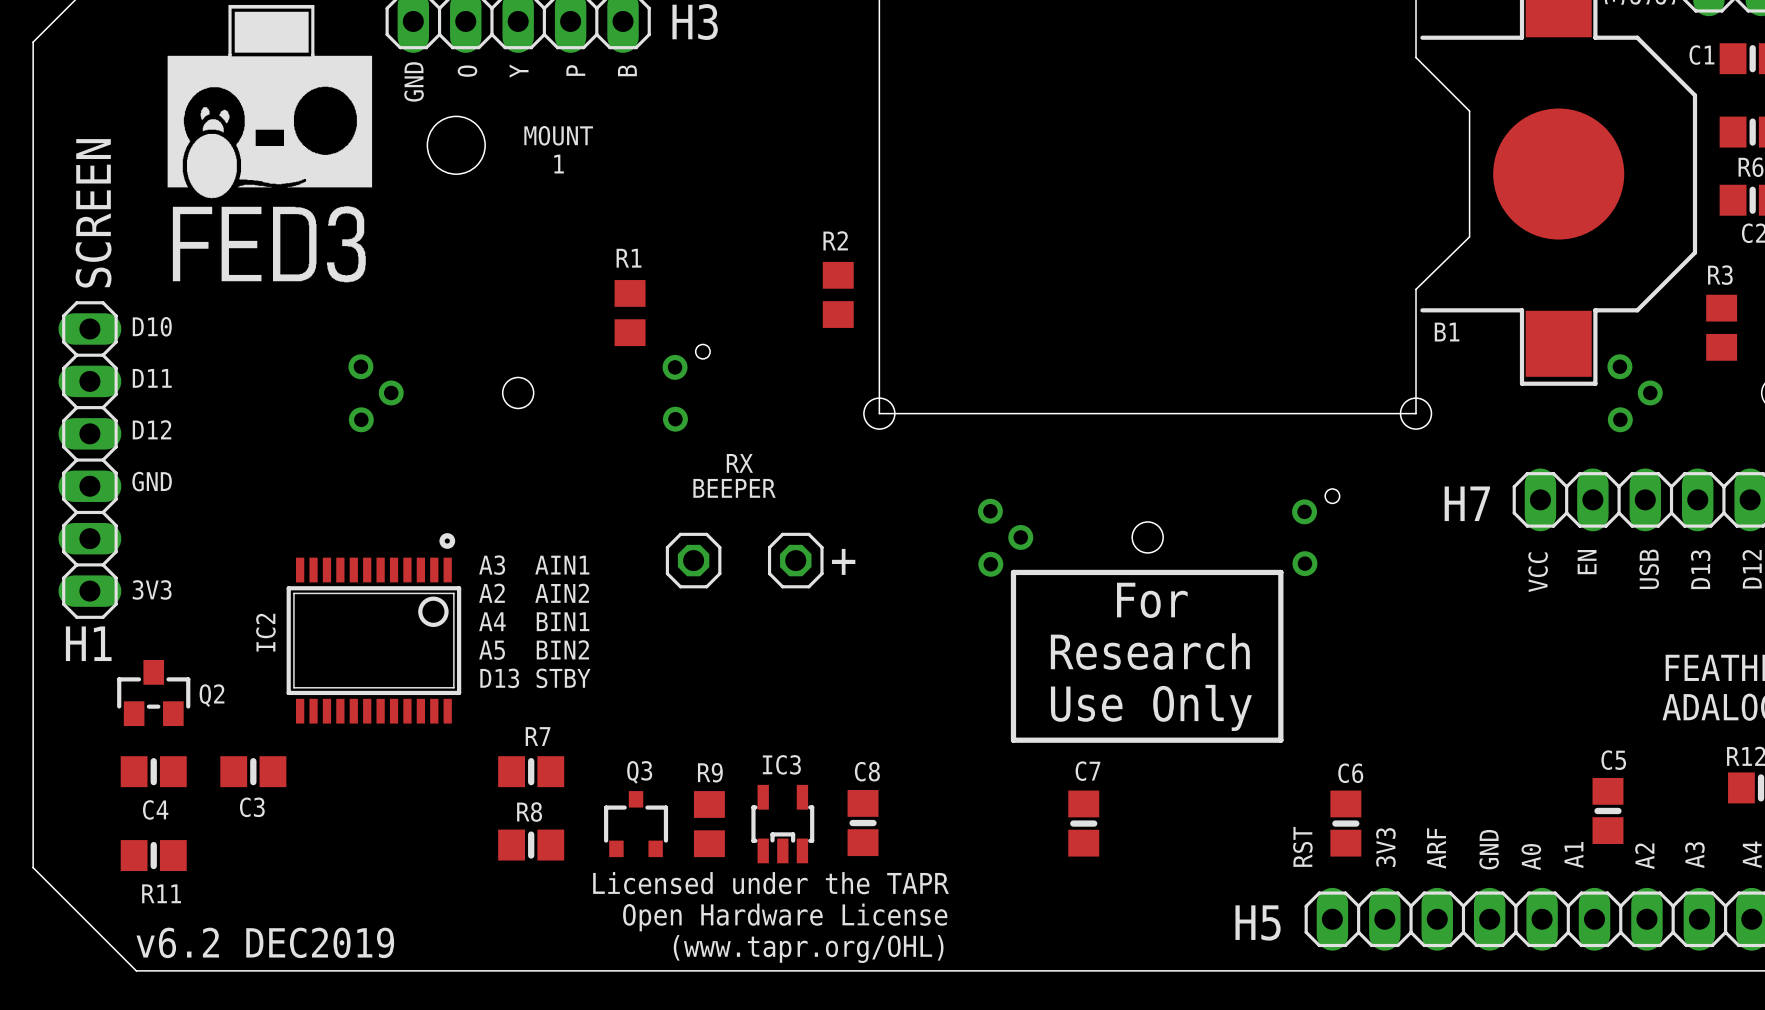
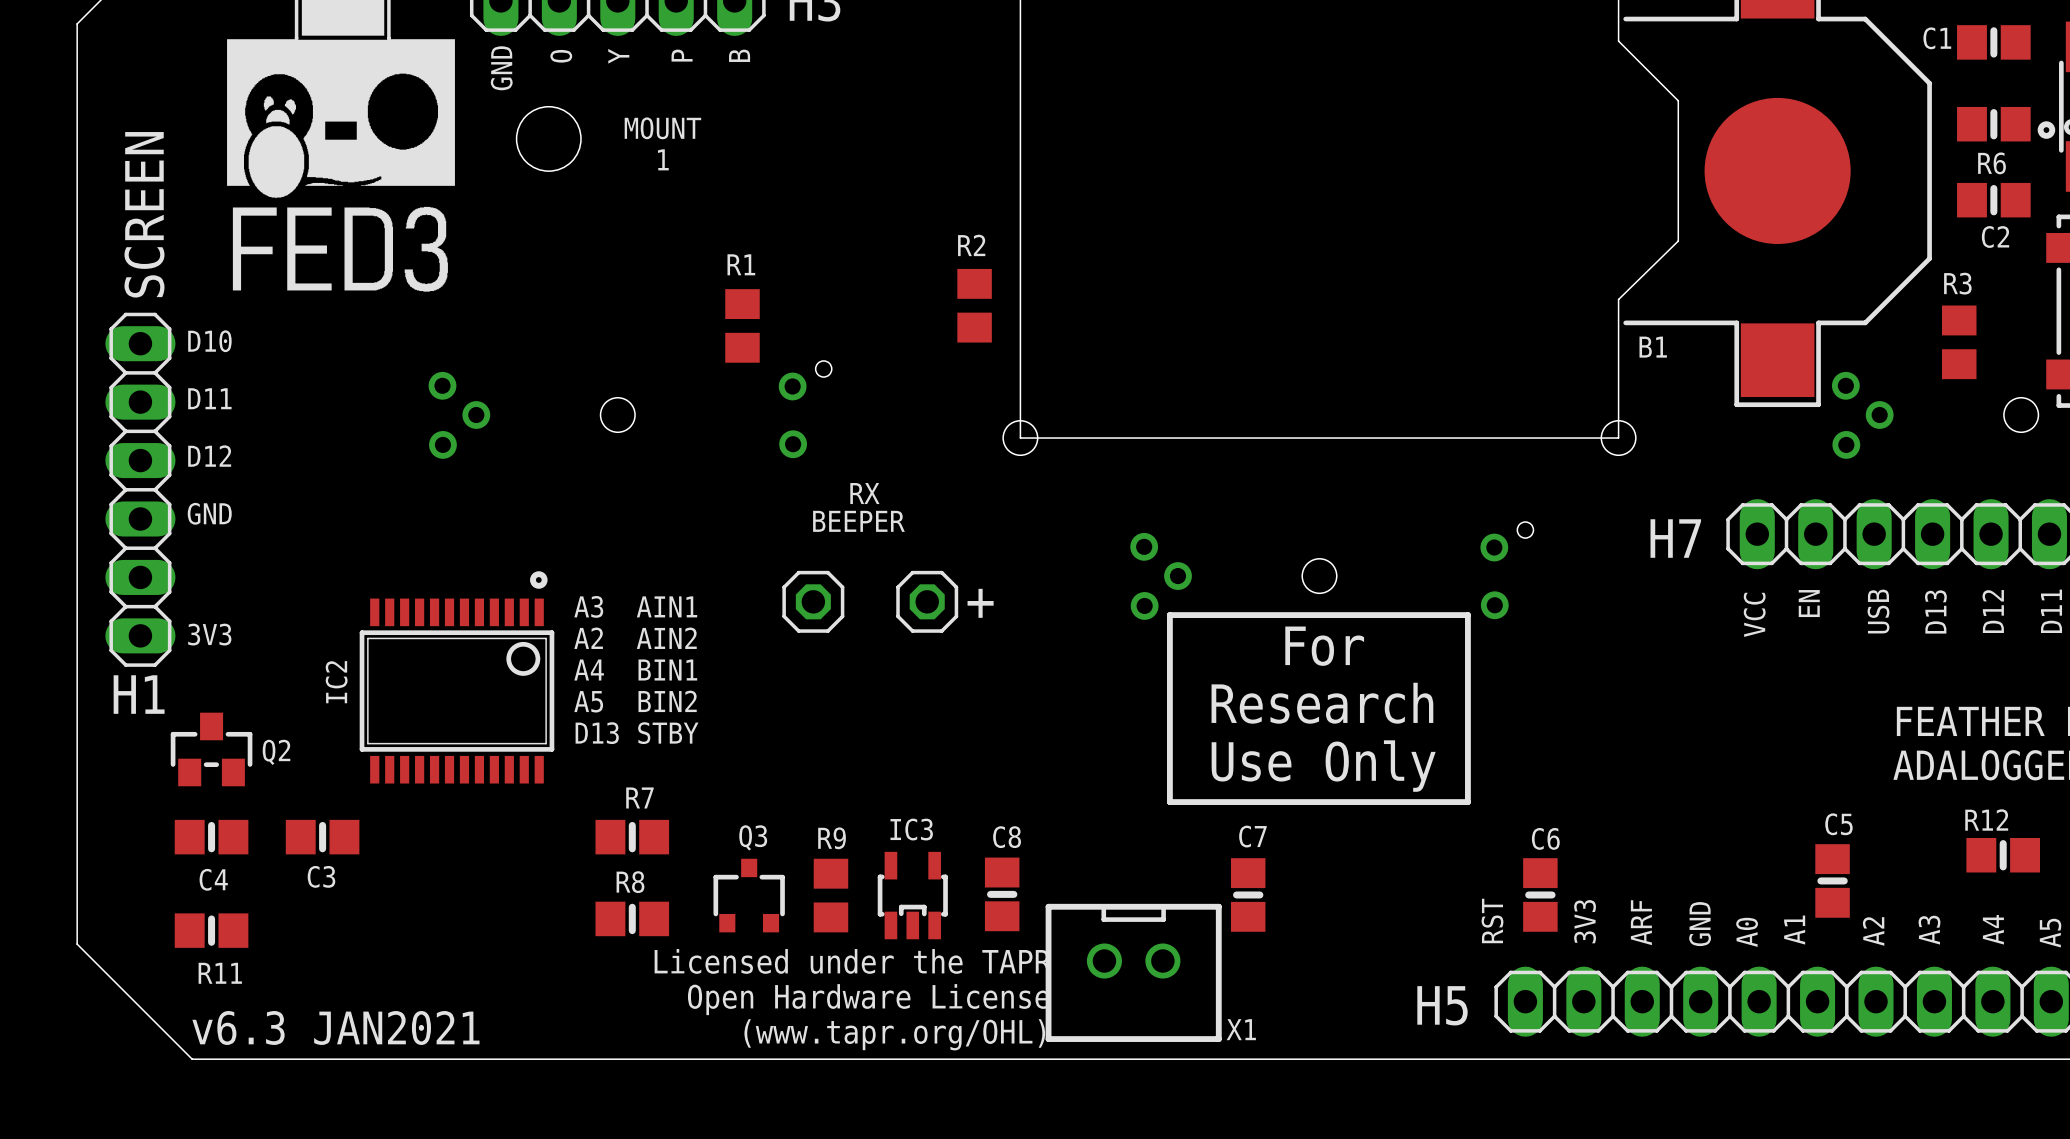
text position: Licensed under the TAPR (771, 883) -> Licensed under the TAPR (852, 961)
X1: none -> (1133, 972)
text position: Open Hardware License (785, 917) -> Open Hardware License (868, 999)
text: v6.2 DEC2019 (265, 942) -> v6.3 JAN2021 (335, 1027)
text position: (www.tapr.org/OHL) (808, 948) -> (www.tapr.org/OHL) (894, 1034)

